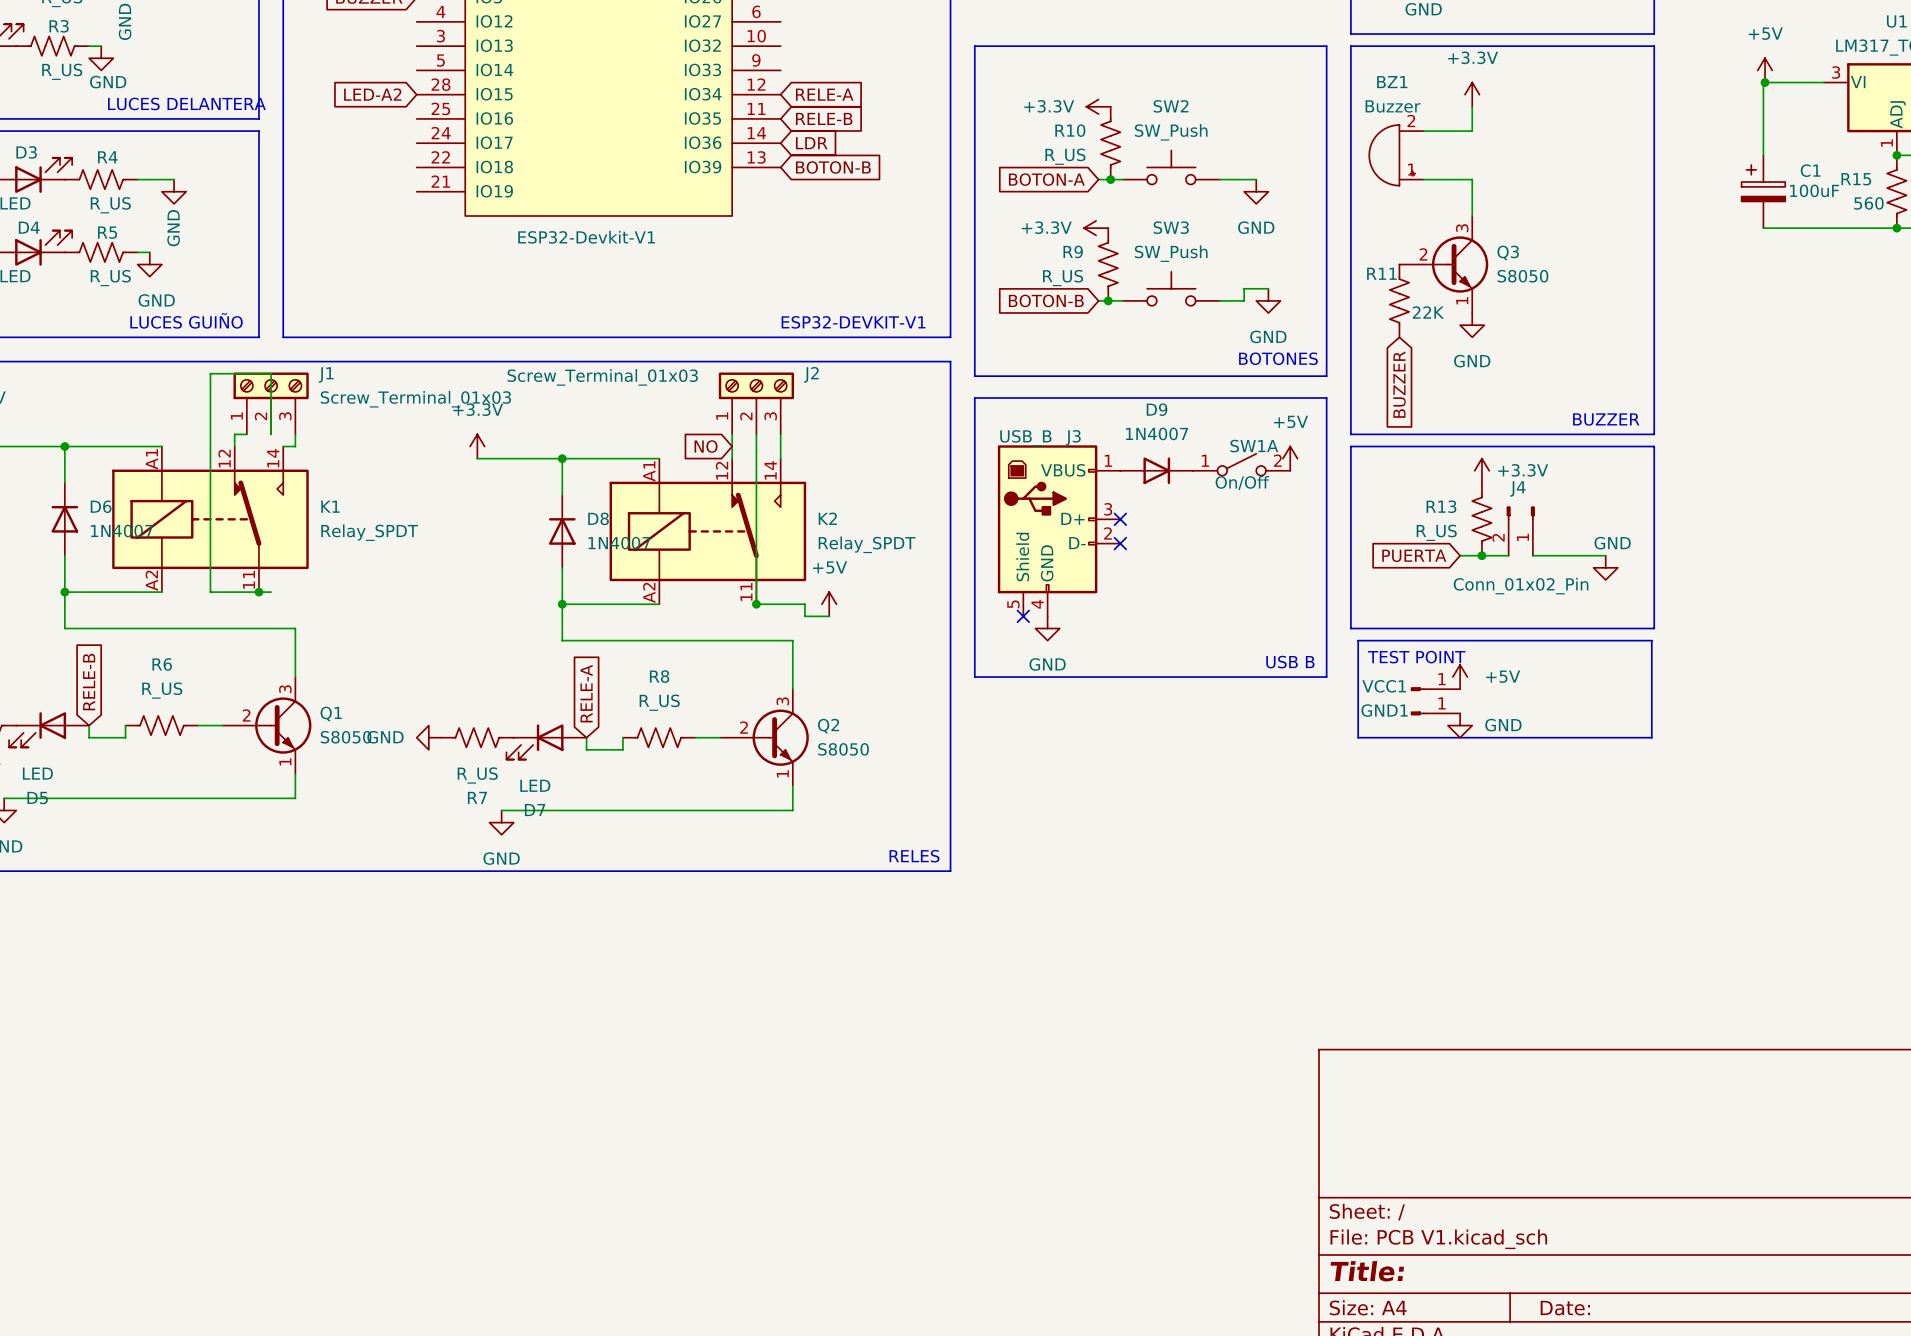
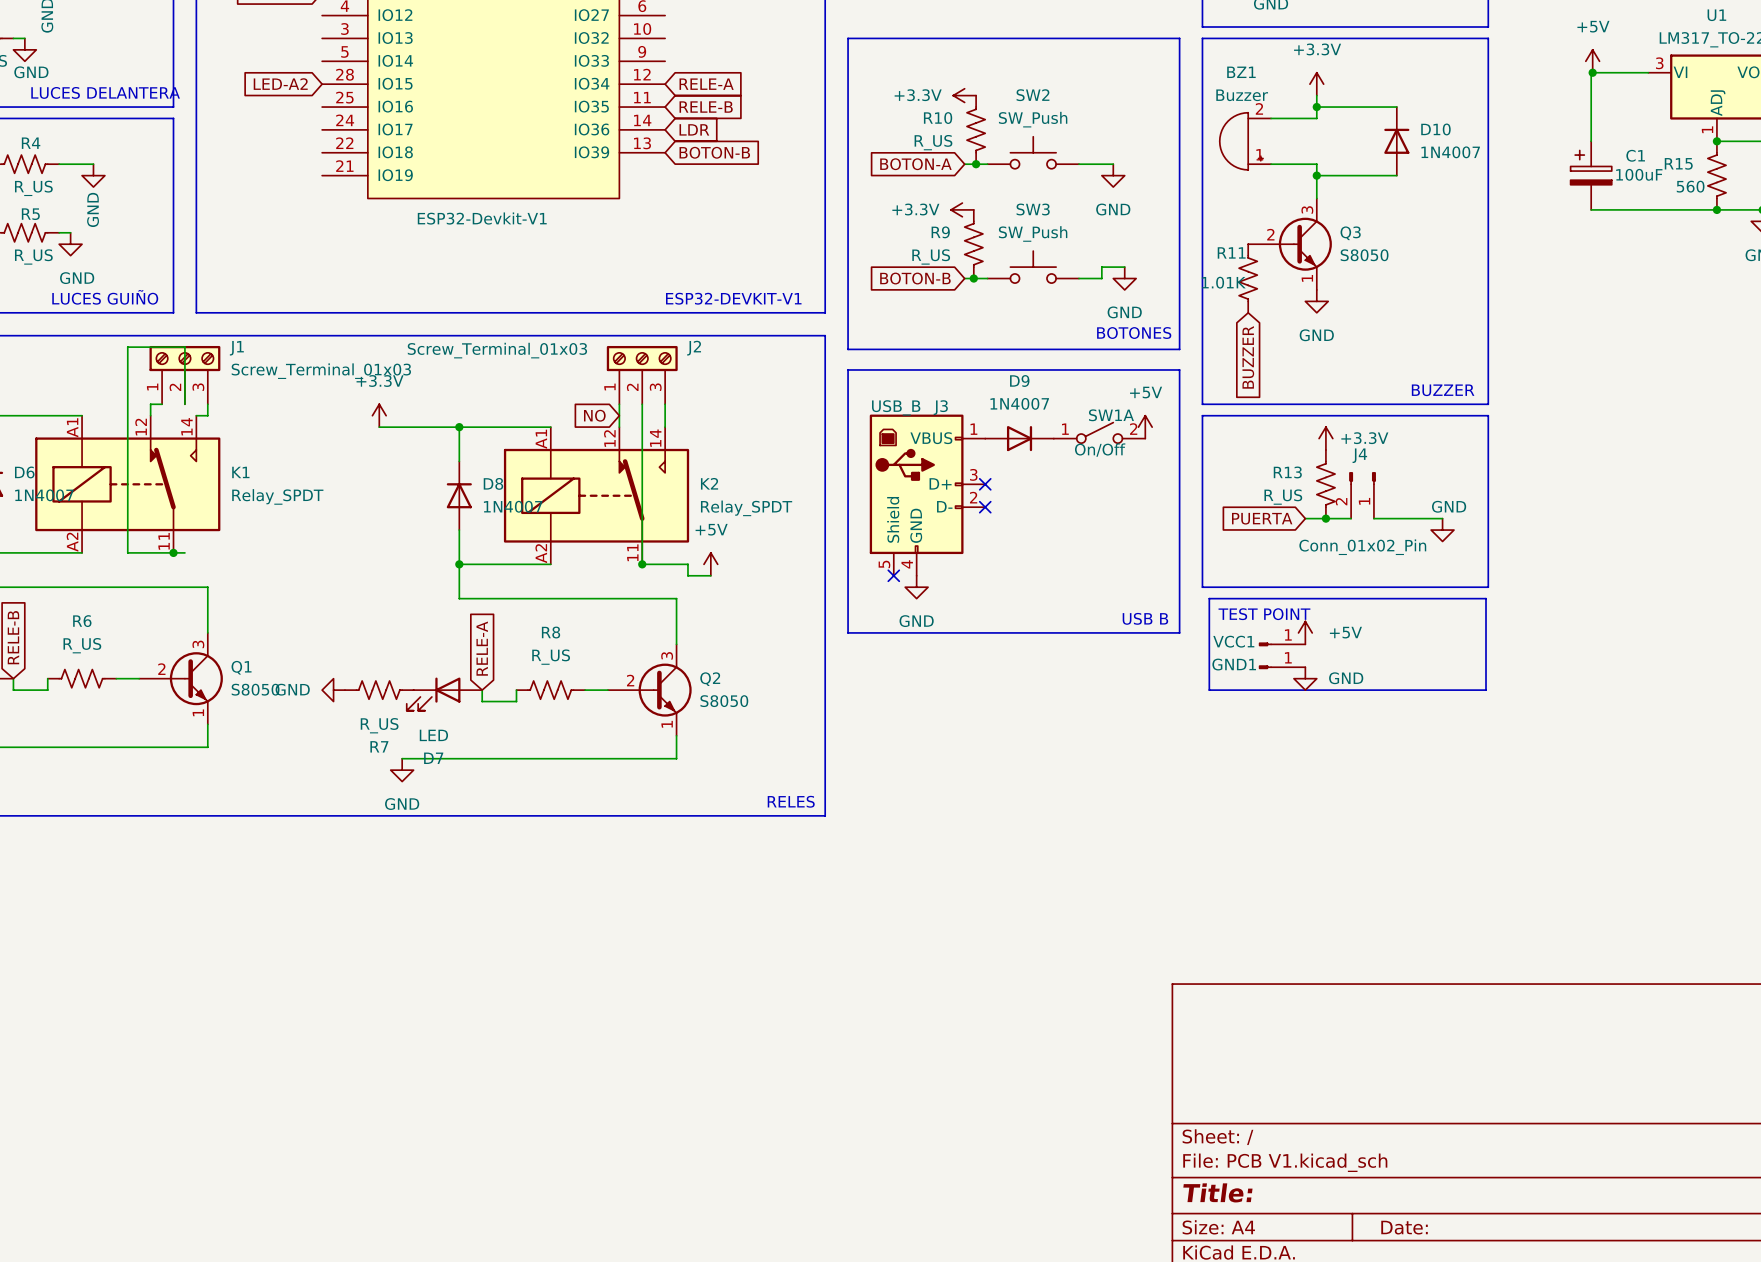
wire: none -> (1316, 107) (1396, 107)
junction: none -> (1316, 107)
D10: none -> 1N4007 (1396, 141)
wire: none -> (1316, 175) (1396, 175)
junction: none -> (1316, 175)
R11 value: 22K (1428, 312) -> 1.01K (1223, 282)

